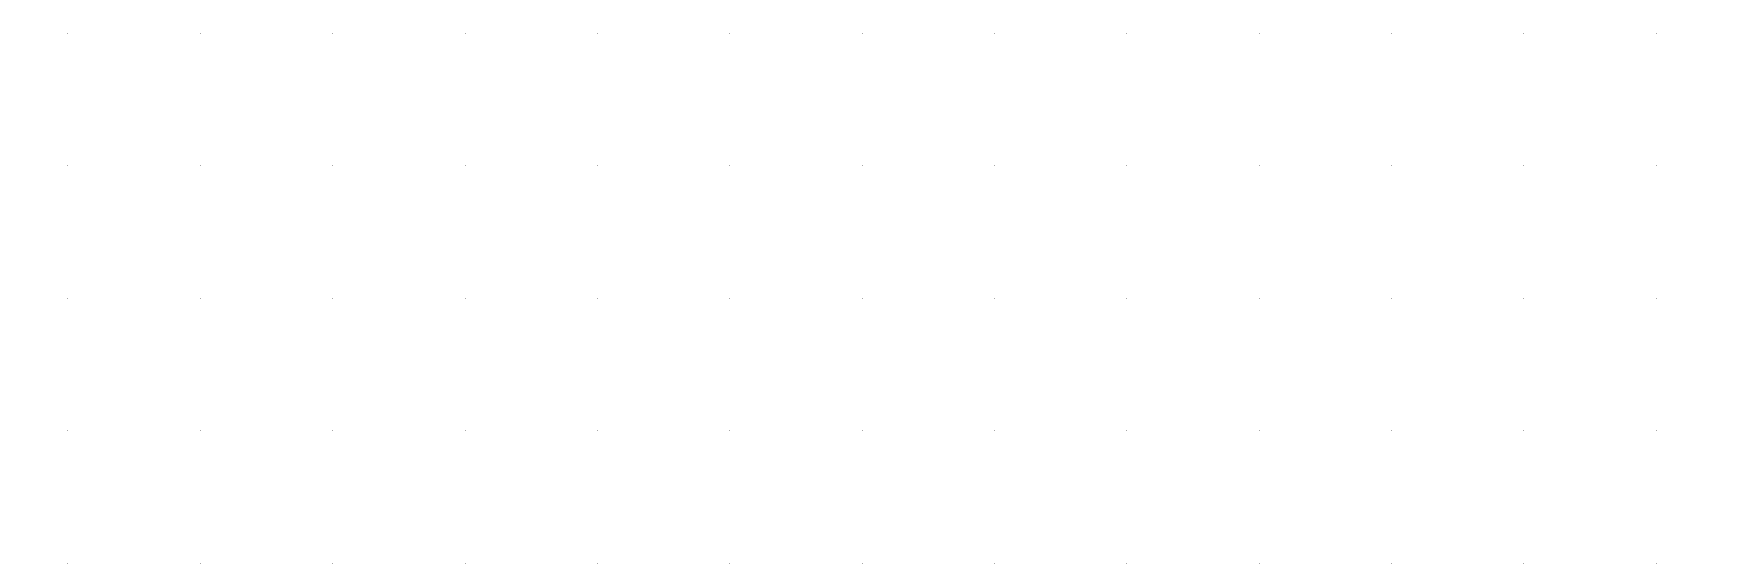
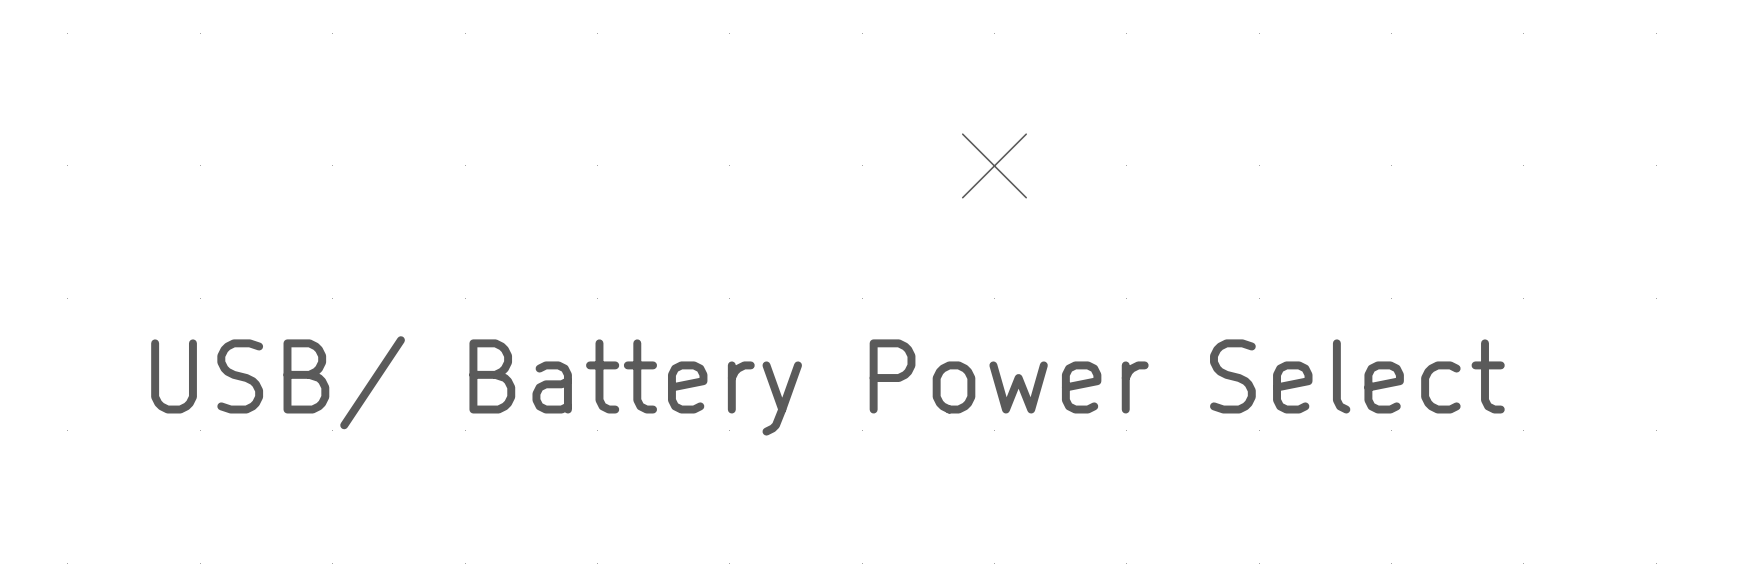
no-connect mark: none -> (994, 165)
text: none -> USB/ Battery Power Select (827, 385)

